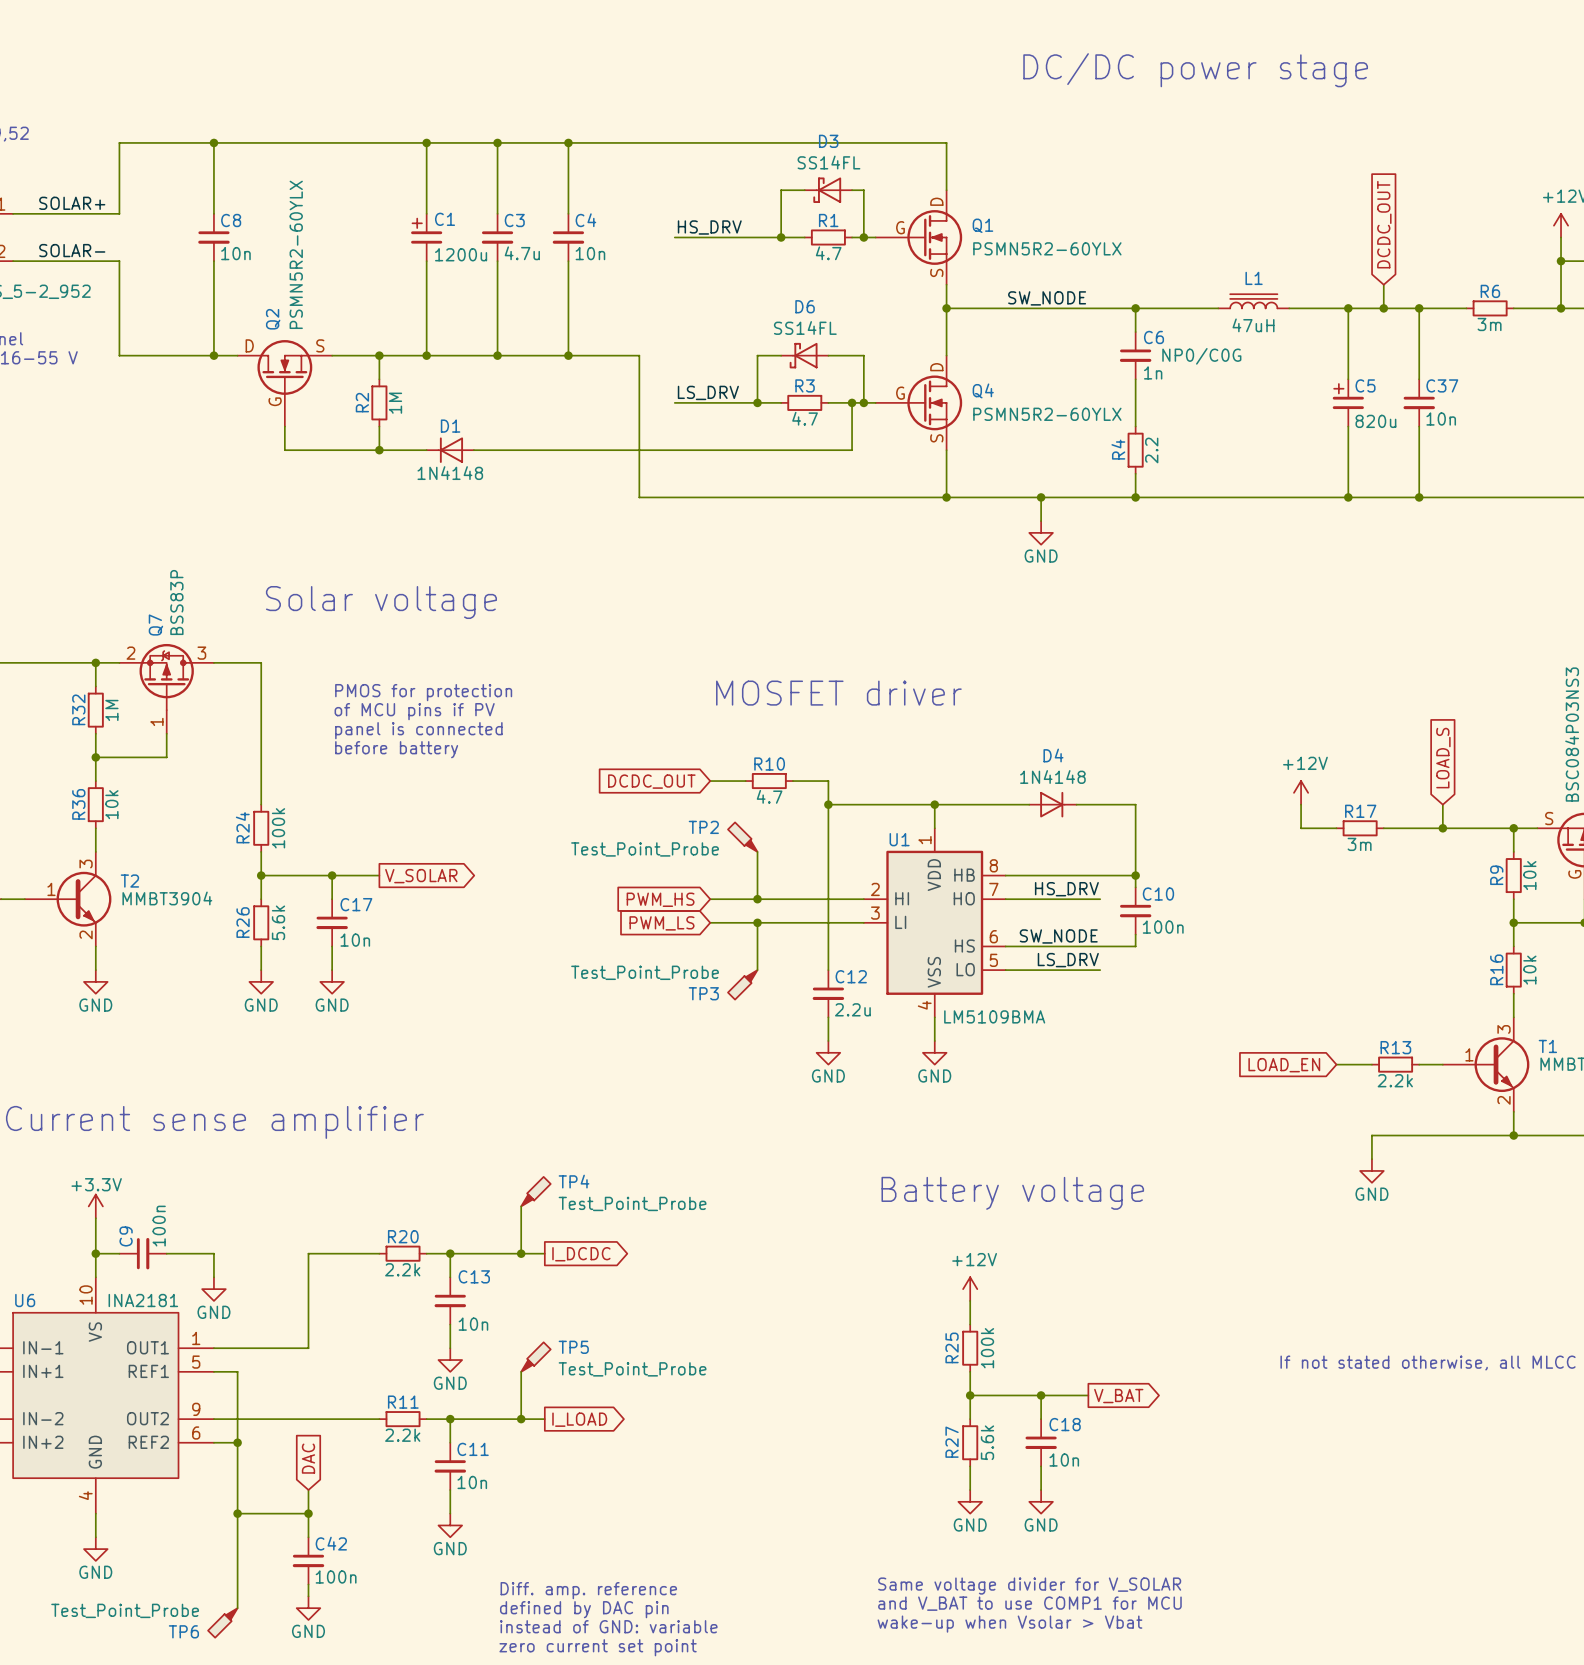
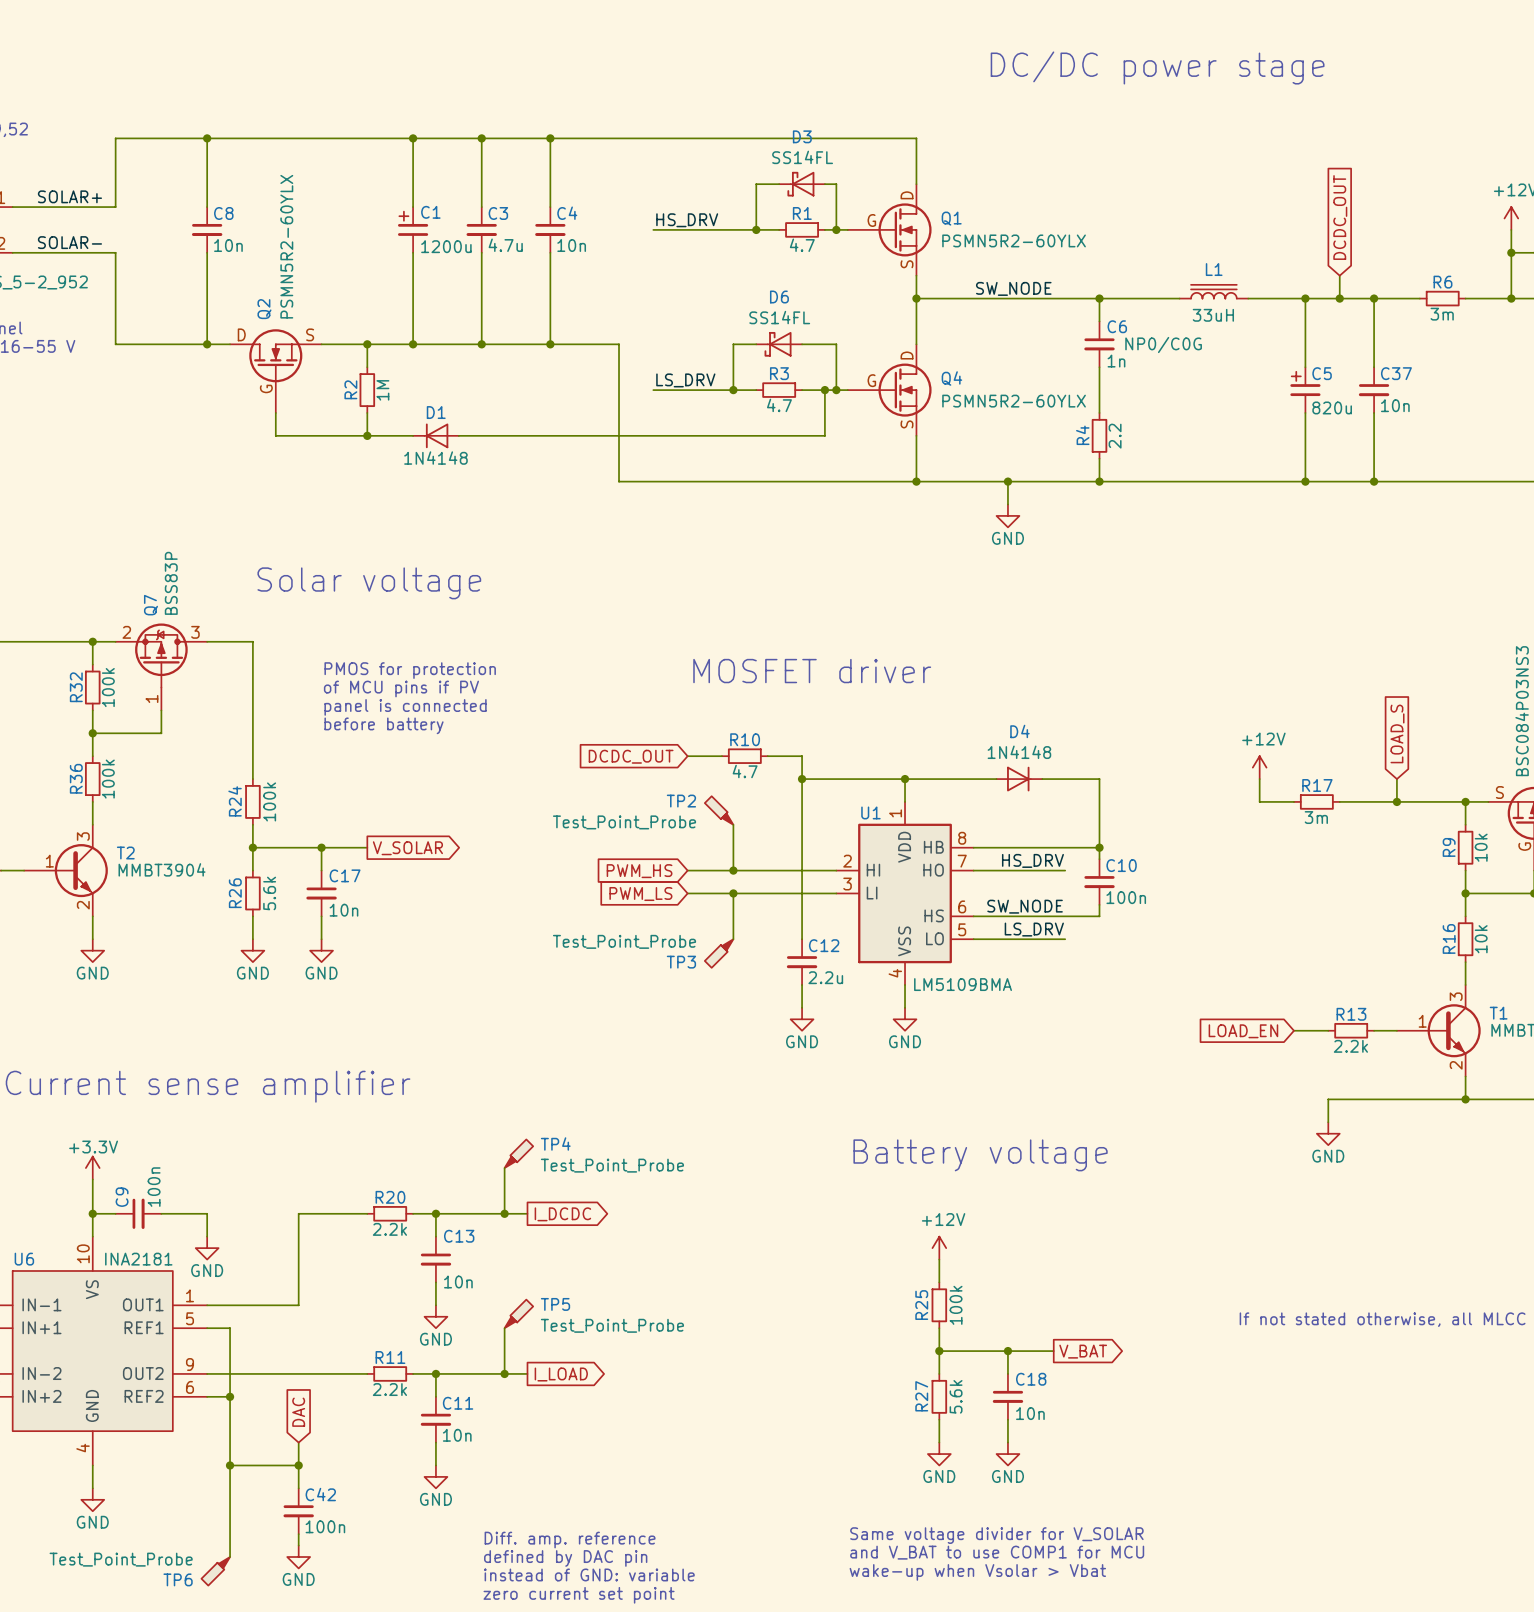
L1 value: 47uH (1253, 325) -> 33uH (1213, 315)
R32 value: 1M (111, 710) -> 100k (108, 687)
R36 value: 10k (111, 804) -> 100k (108, 779)

